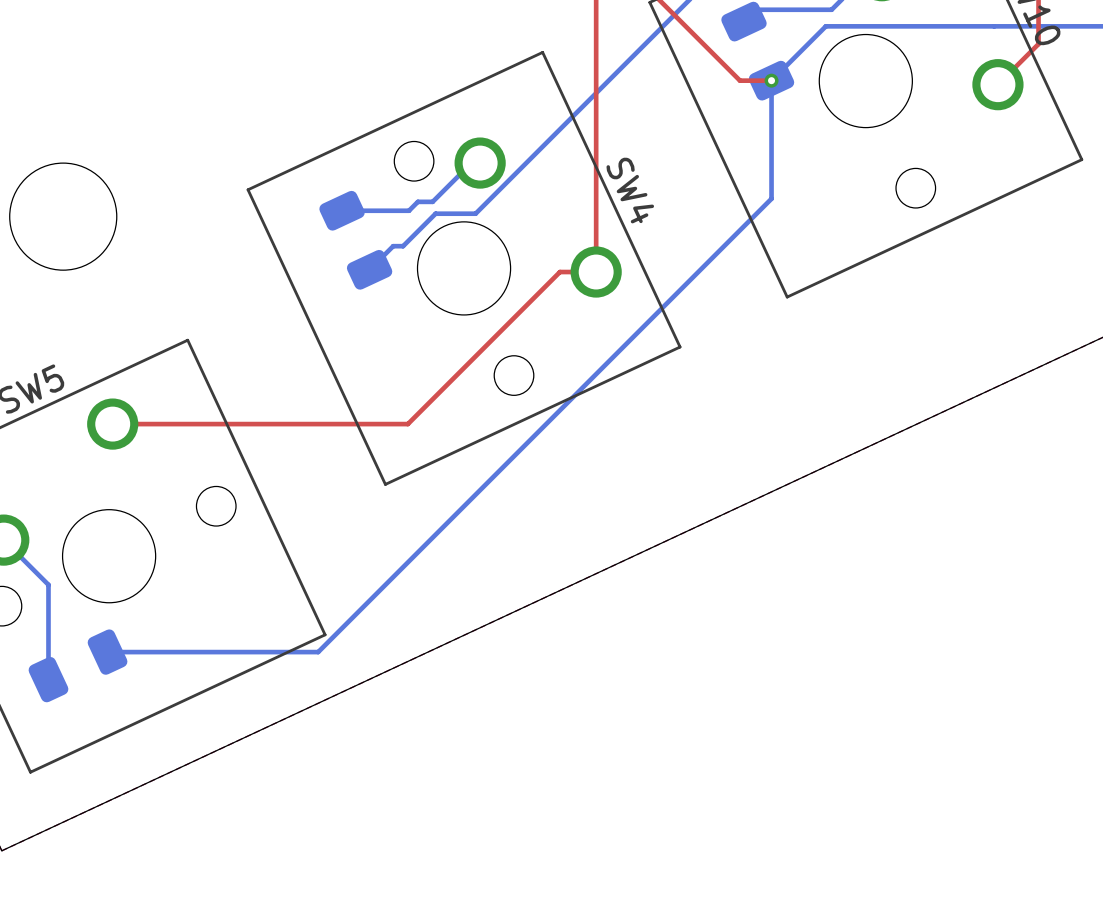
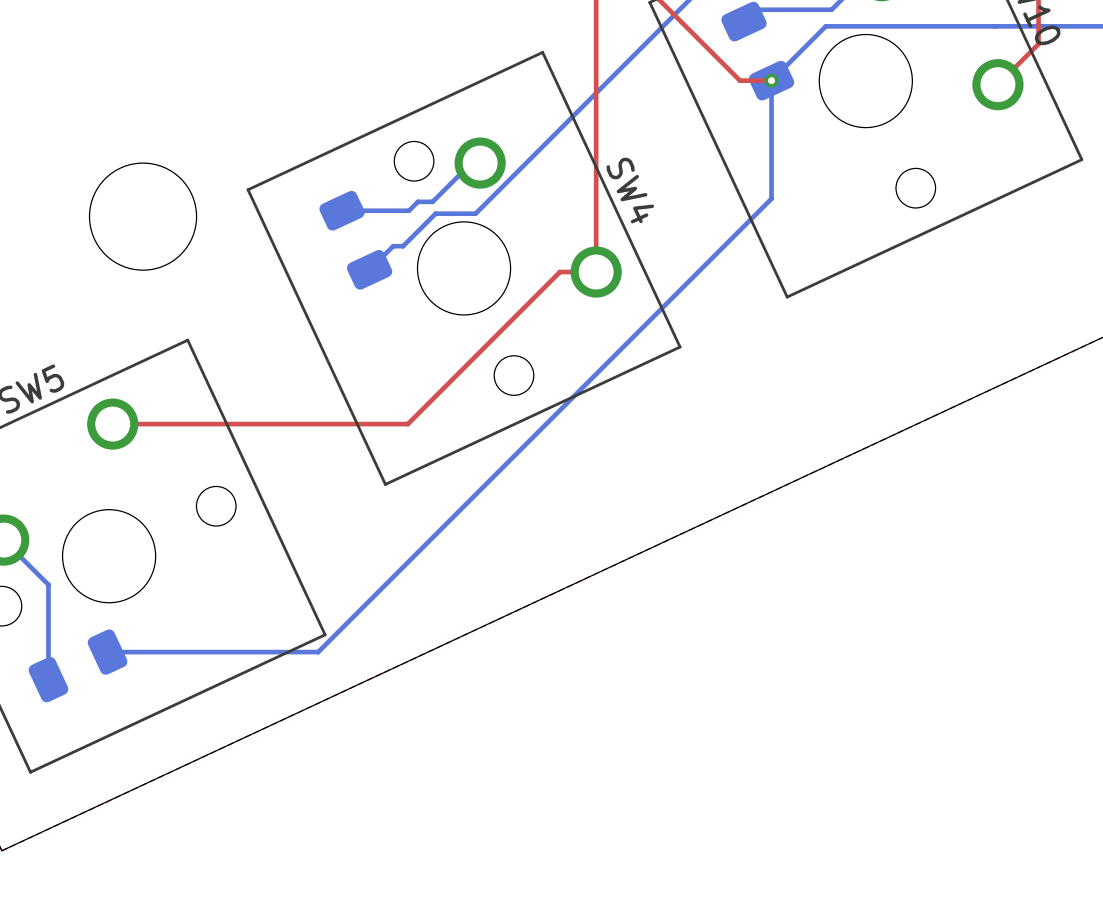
round board edge position: (63, 216) -> (143, 216)

